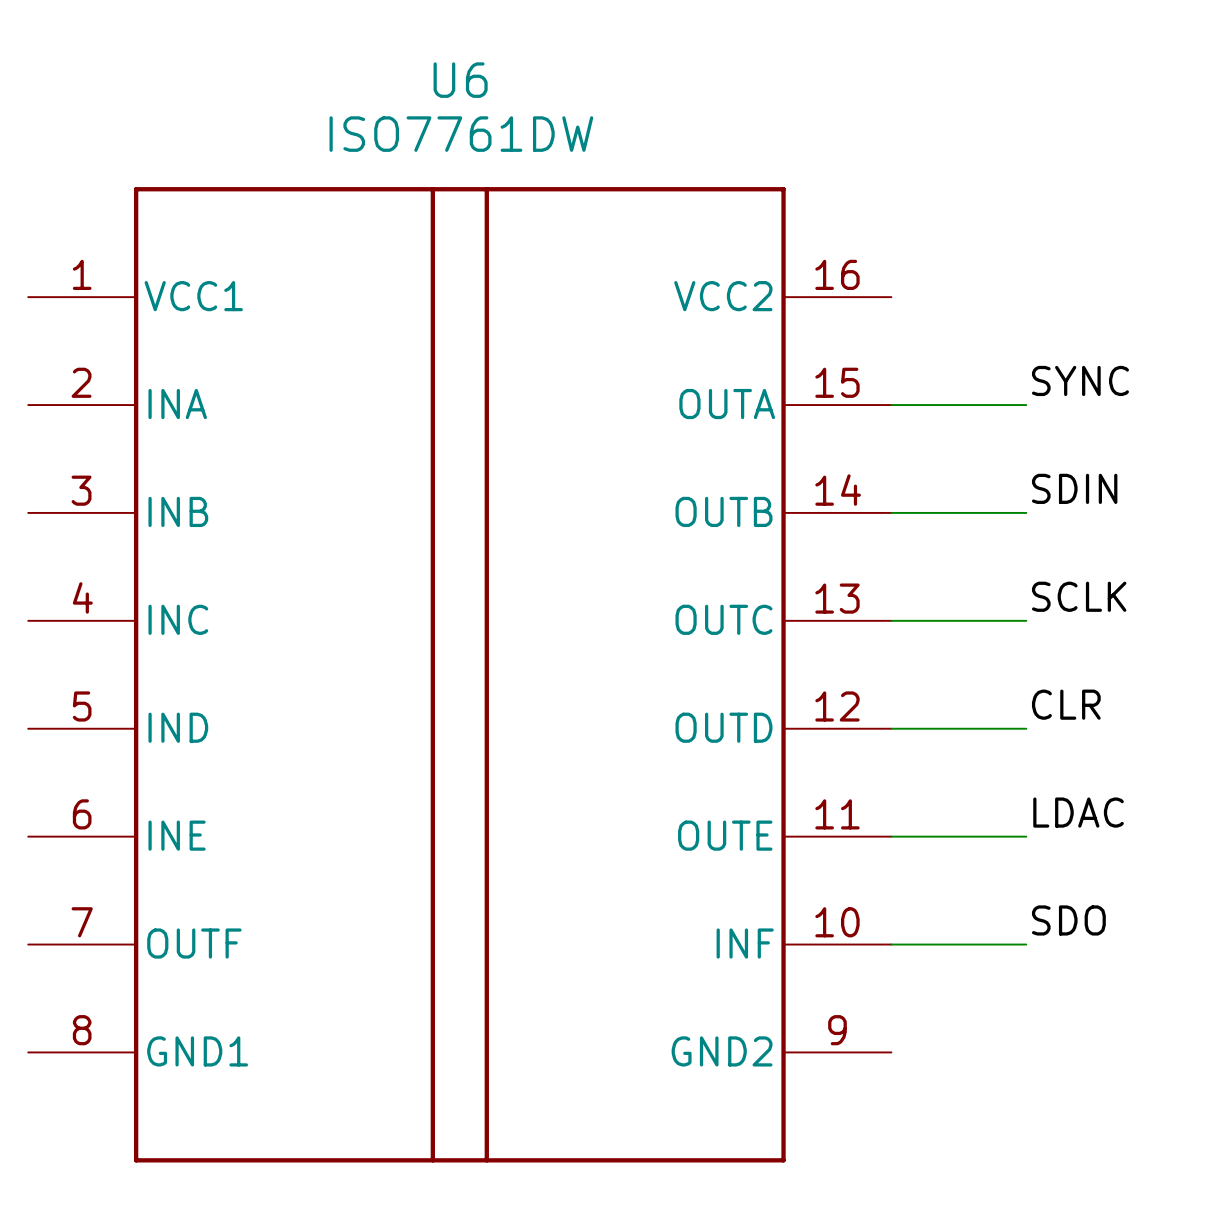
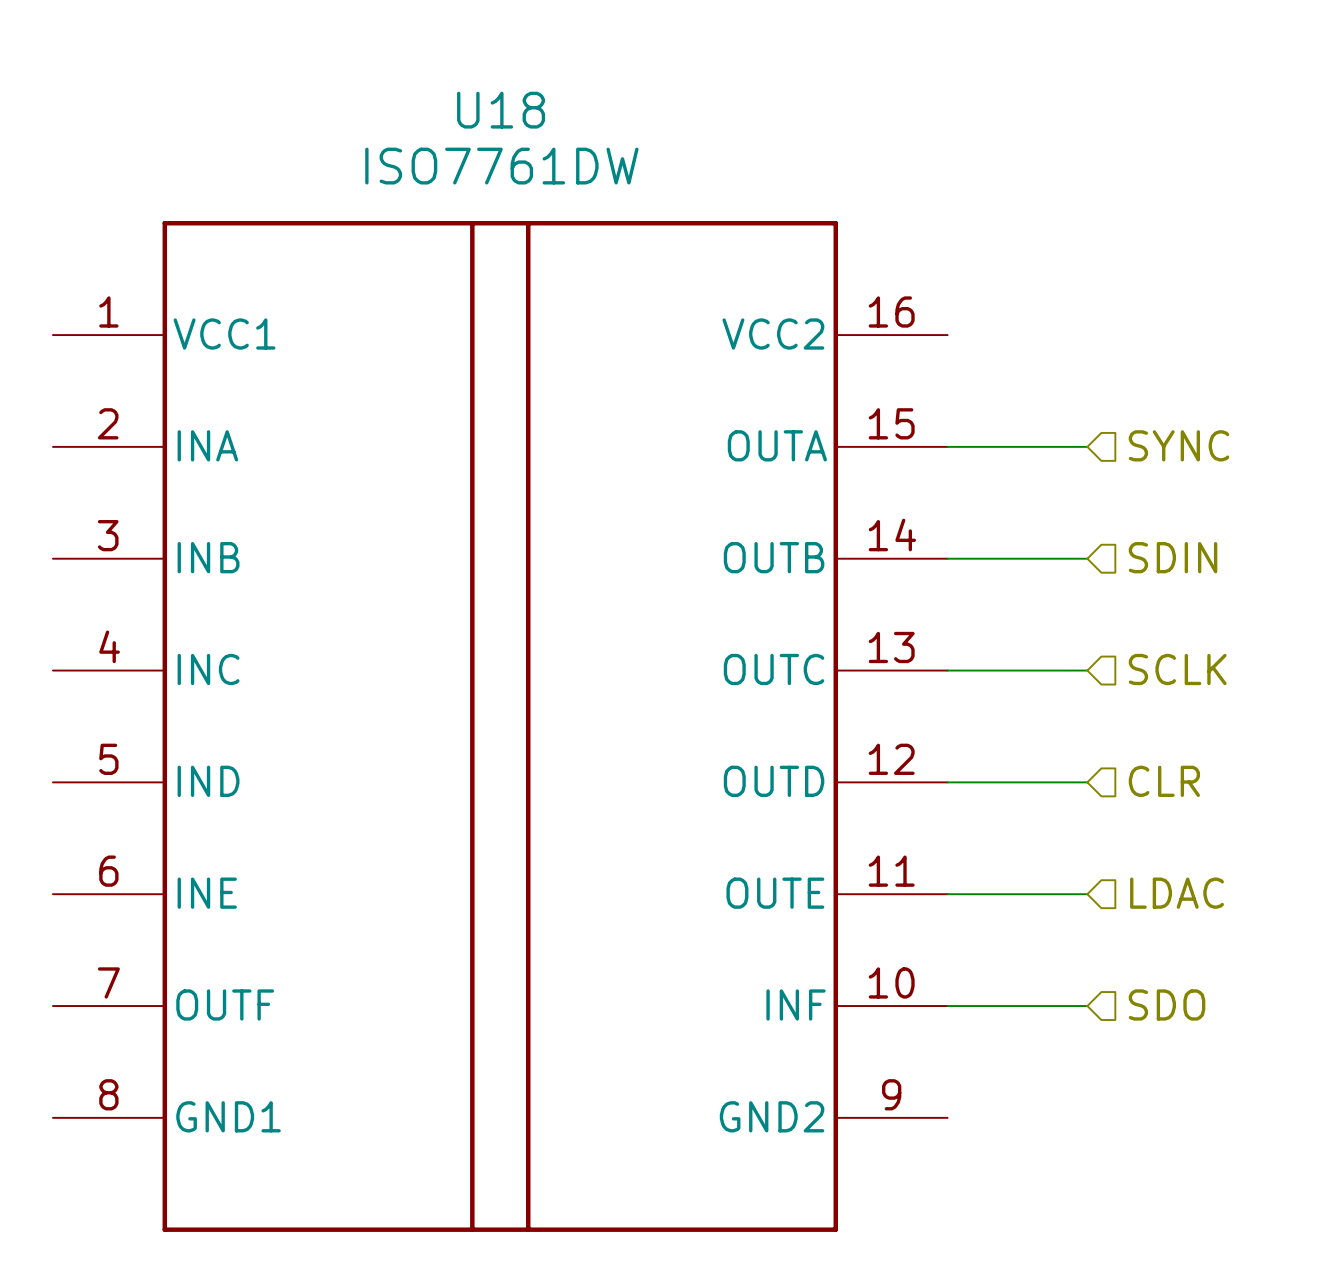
U6 name: U6 (460, 80) -> U18 (501, 110)
label: SYNC (1080, 380) -> none
hierarchical label: none -> SYNC (1179, 445)
label: SDIN (1074, 488) -> none
hierarchical label: none -> SDIN (1173, 557)
label: SCLK (1079, 596) -> none
hierarchical label: none -> SCLK (1177, 669)
label: CLR (1066, 704) -> none
hierarchical label: none -> CLR (1164, 781)
label: LDAC (1078, 812) -> none
hierarchical label: none -> LDAC (1177, 893)
label: SDO (1068, 920) -> none
hierarchical label: none -> SDO (1167, 1004)

